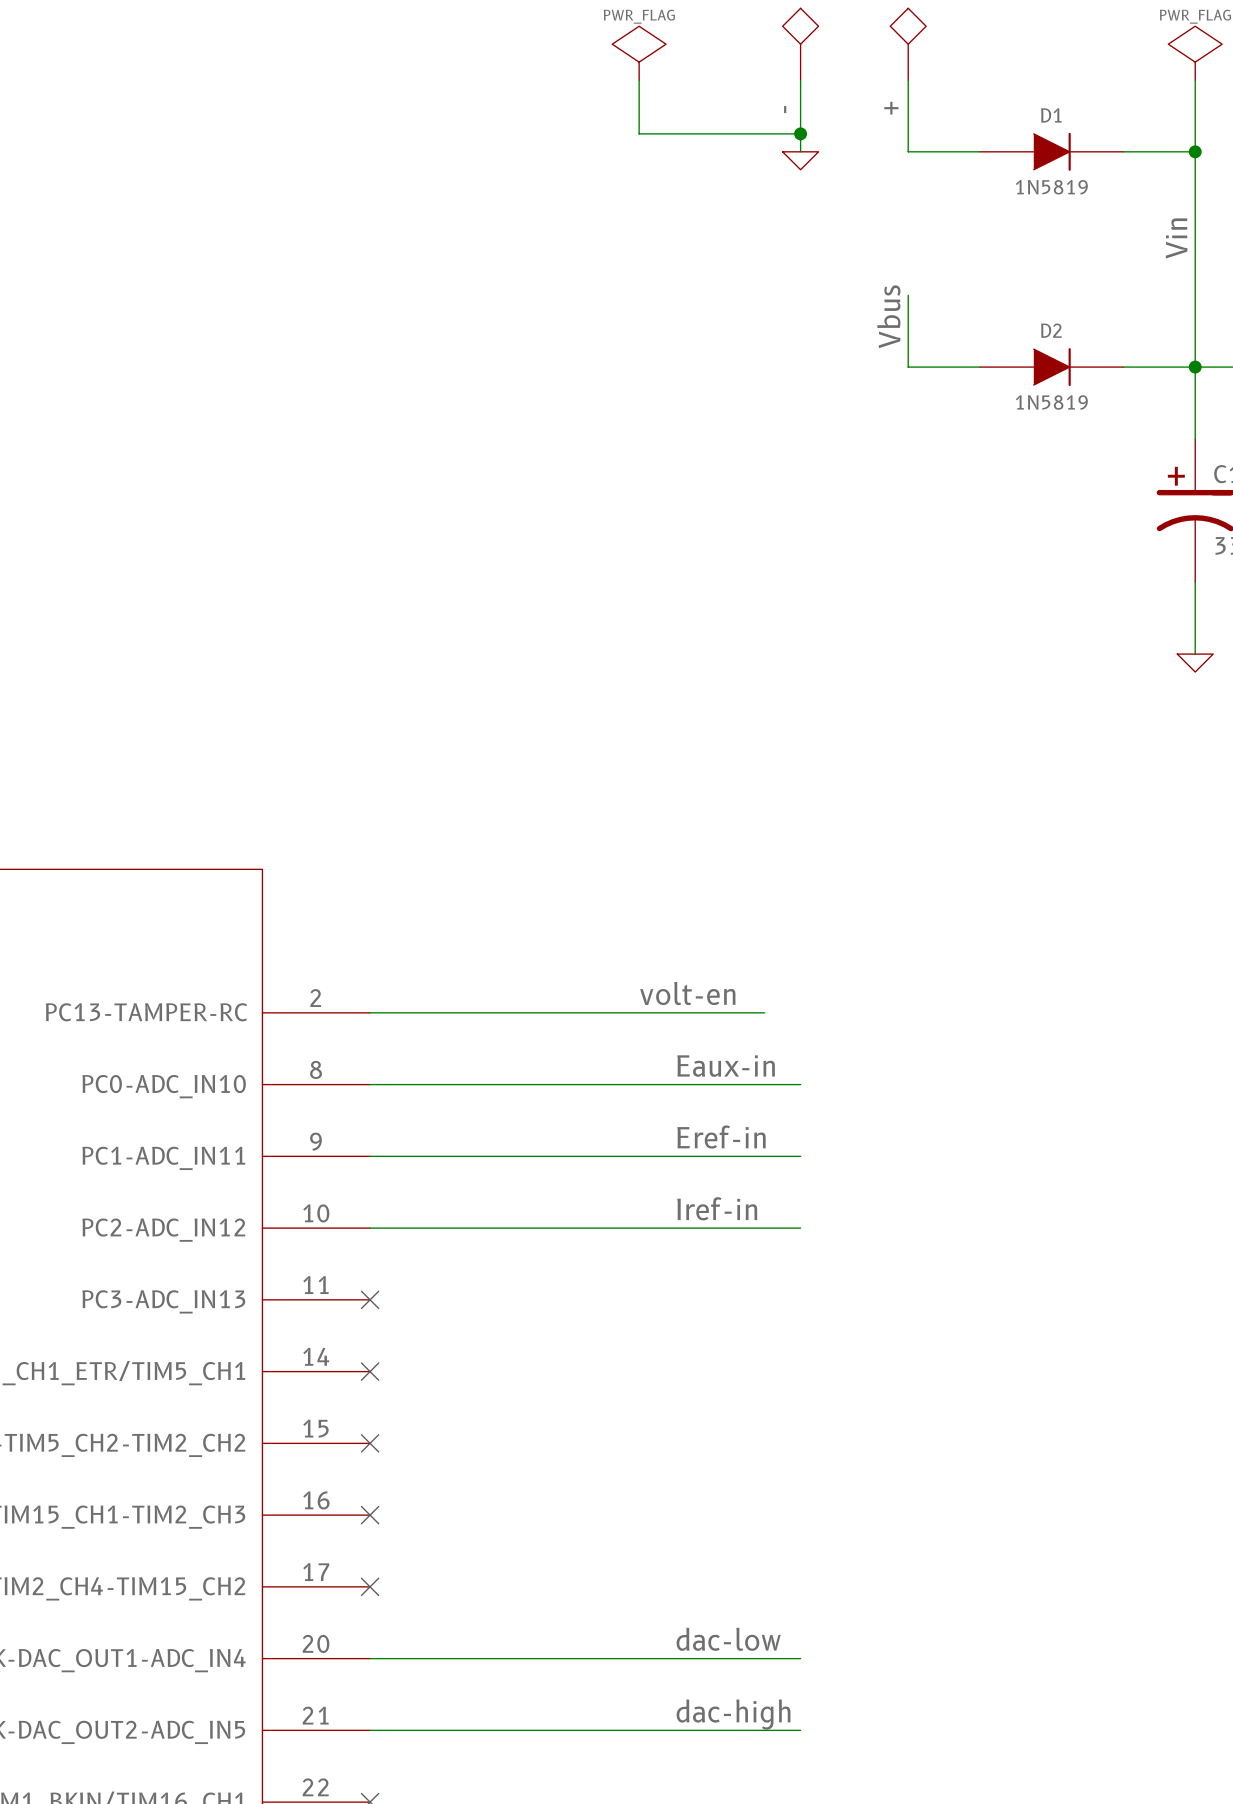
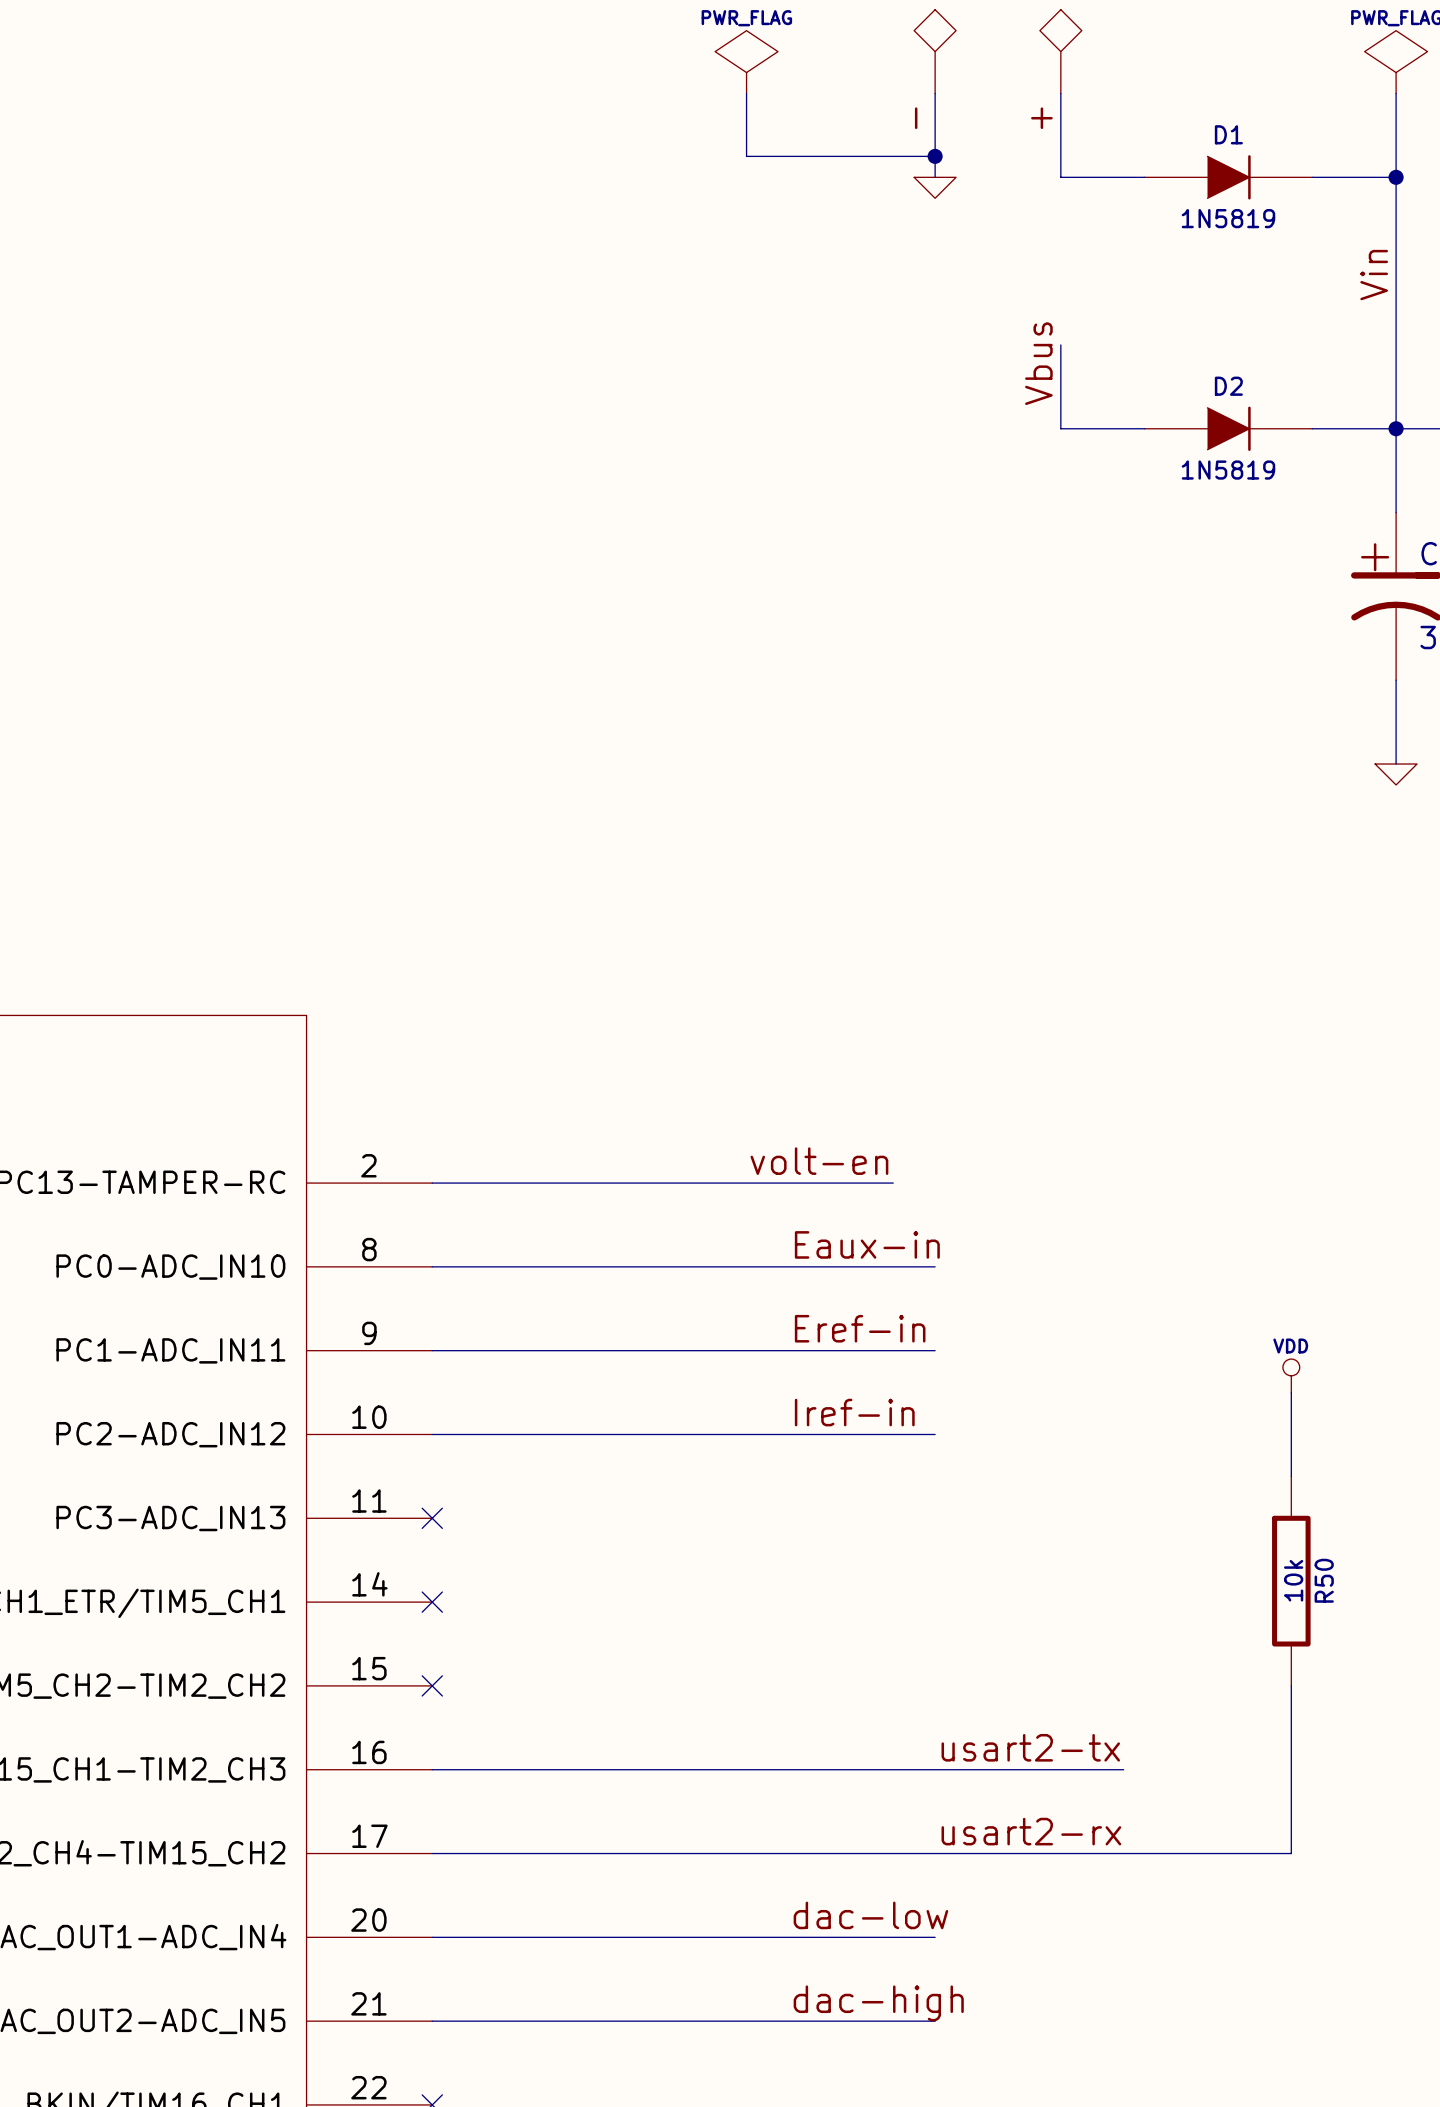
power symbol: none -> VDD (1291, 1375)
wire: none -> (1291, 1392) (1291, 1476)
R50: none -> 10k (1291, 1581)
wire: none -> (1291, 1685) (1291, 1853) (432, 1853)
label: none -> usart2-tx (1030, 1747)
wire: none -> (432, 1769) (1123, 1769)
no-connect mark: (370, 1515) -> none
label: none -> usart2-rx (1031, 1831)
no-connect mark: (370, 1586) -> none

